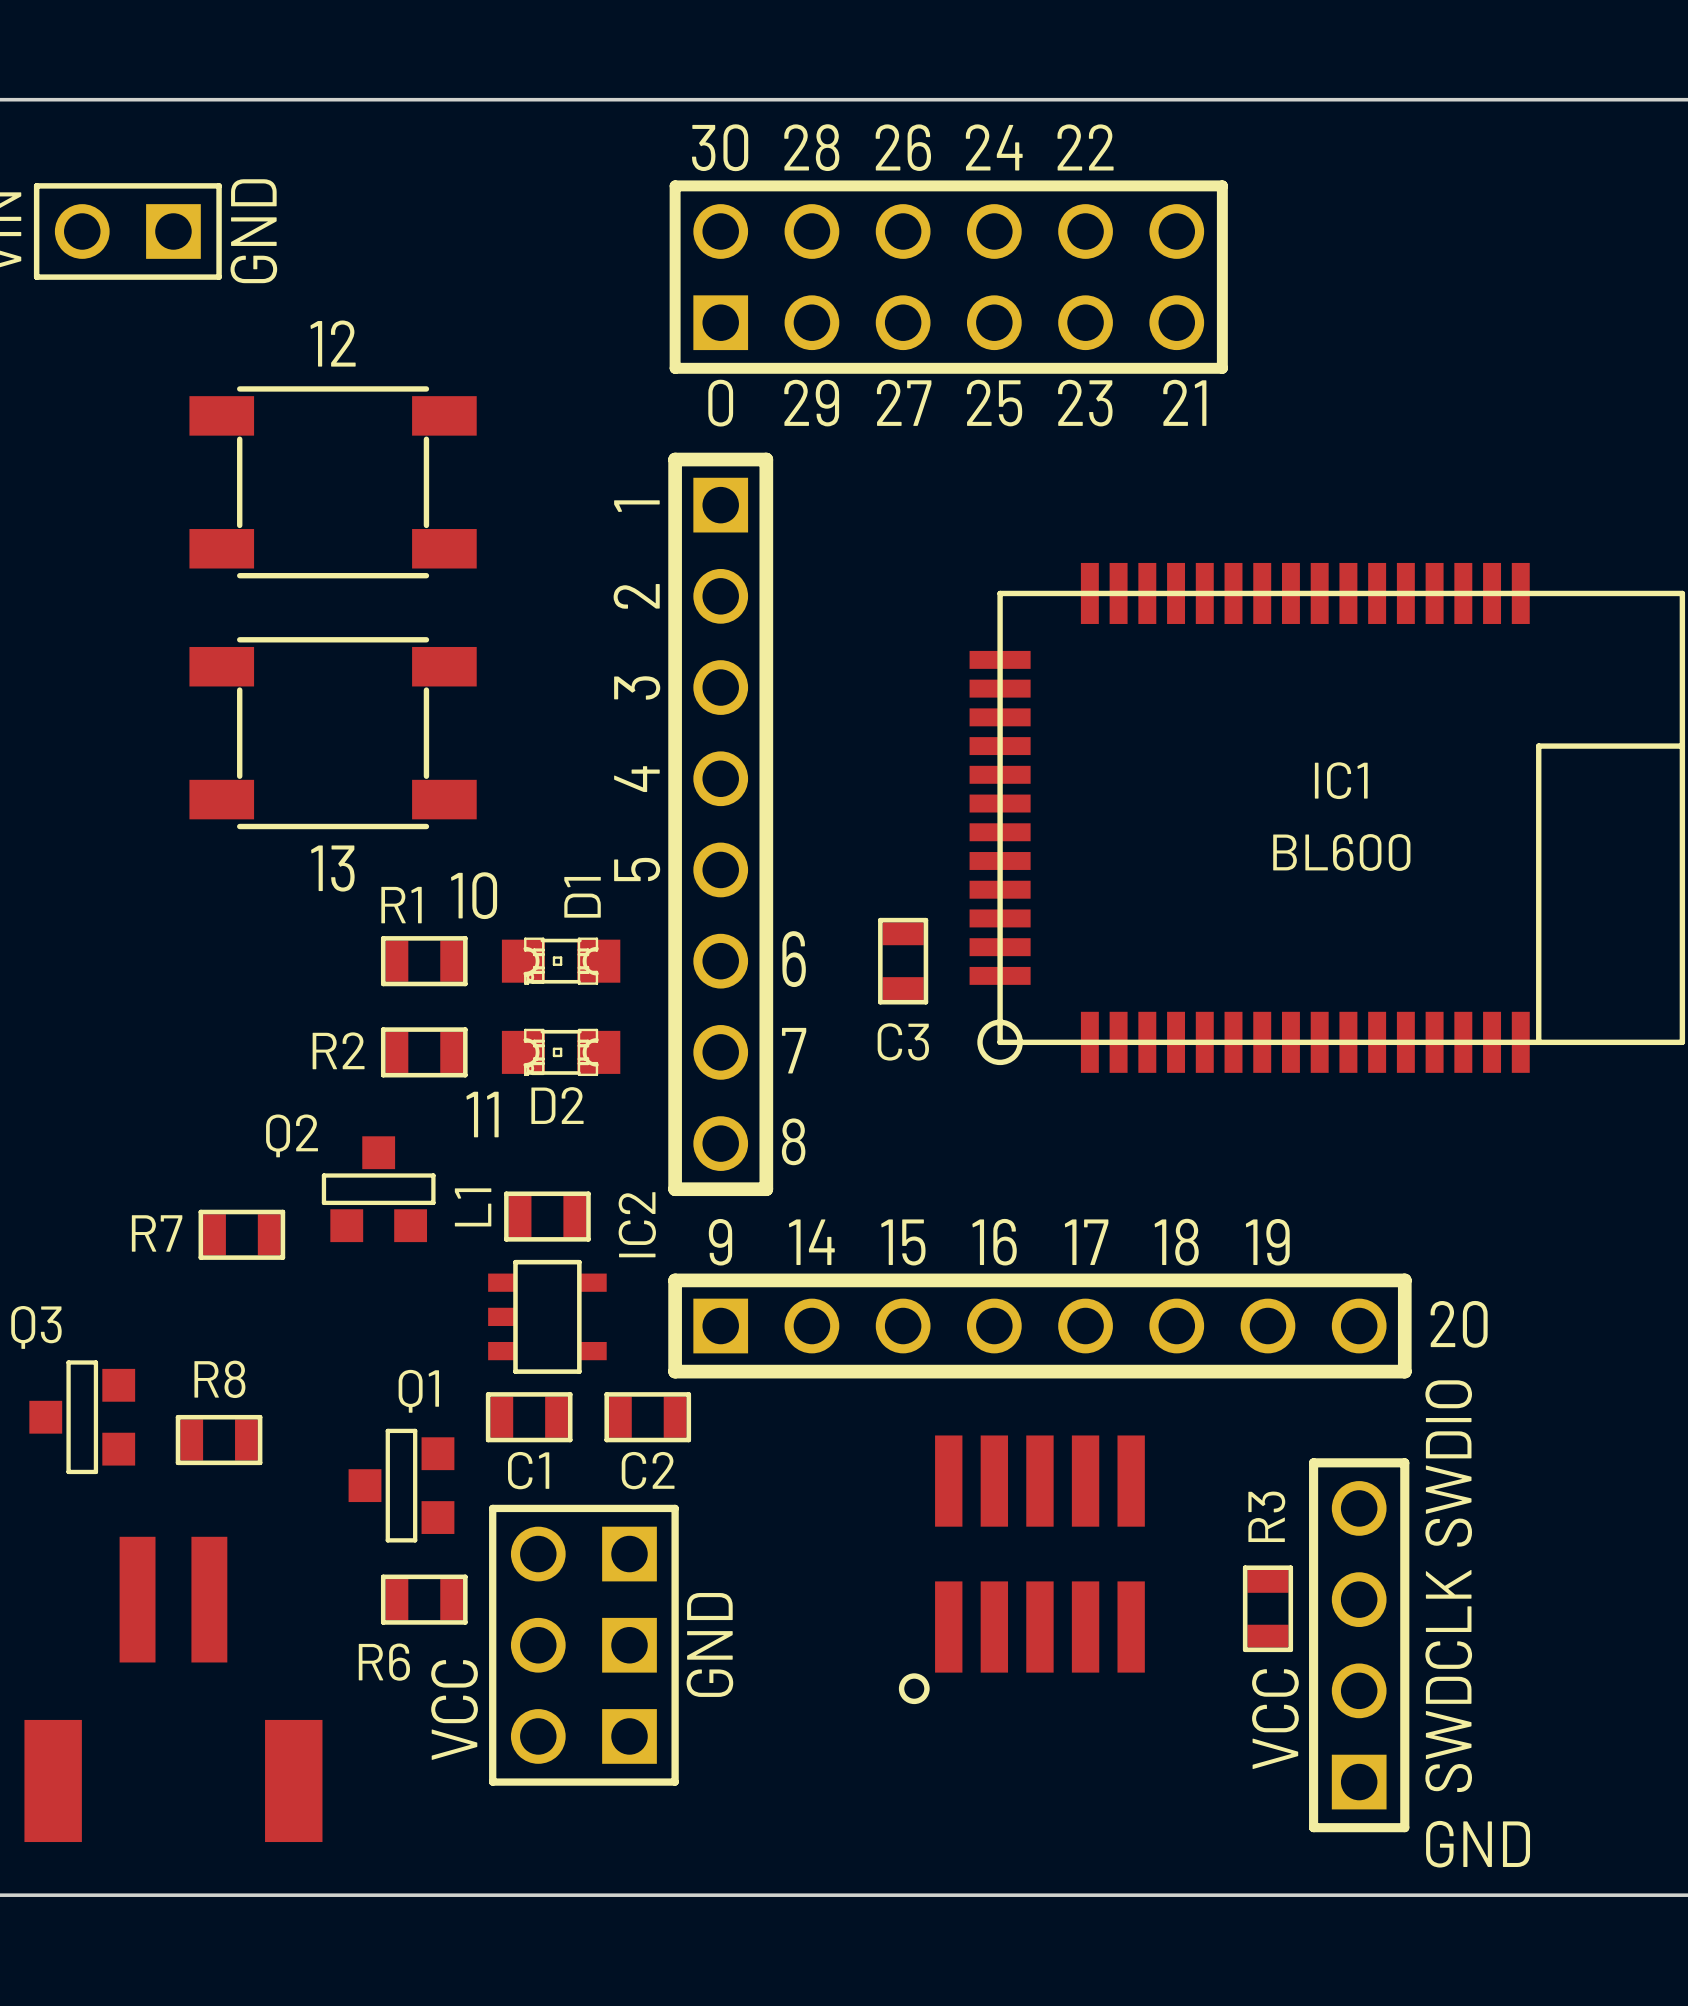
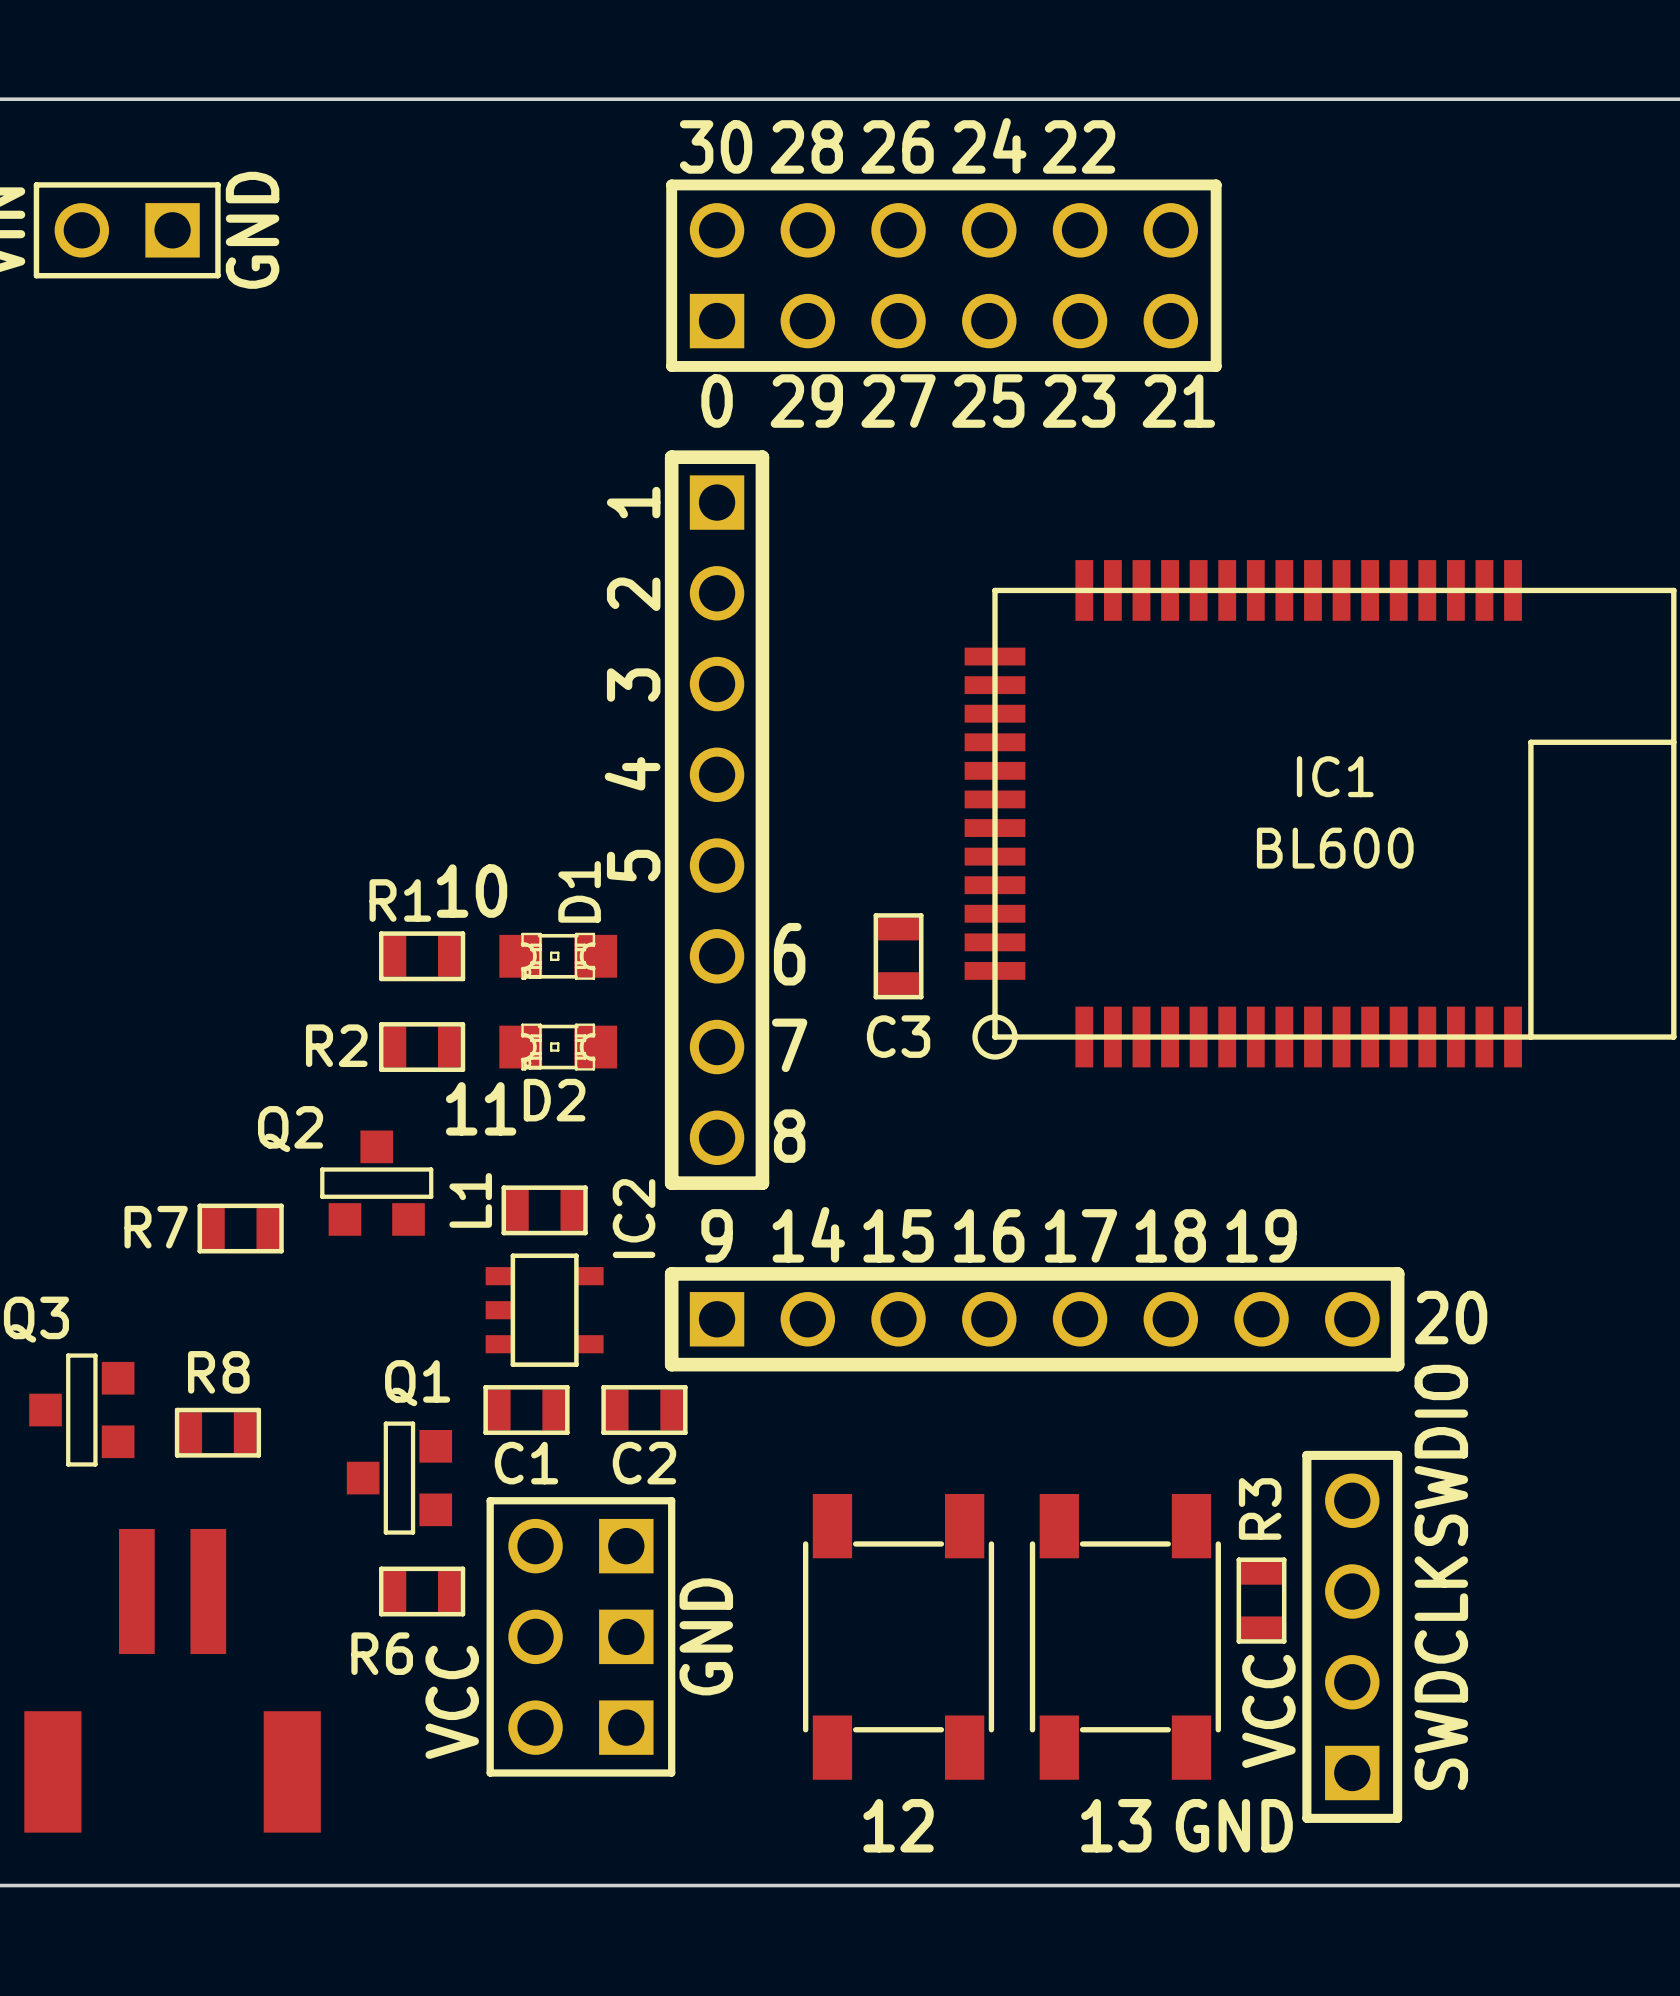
text: 12 (333, 343) -> none
part: (333, 482) -> none
part: (333, 733) -> none
text: 13 (332, 868) -> none
part: (1021, 1569) -> none
part: none -> (898, 1636)
part: none -> (1125, 1636)
text: none -> 12 (898, 1825)
text: none -> 13 (1116, 1825)
text position: GND (1478, 1844) -> GND (1234, 1825)

